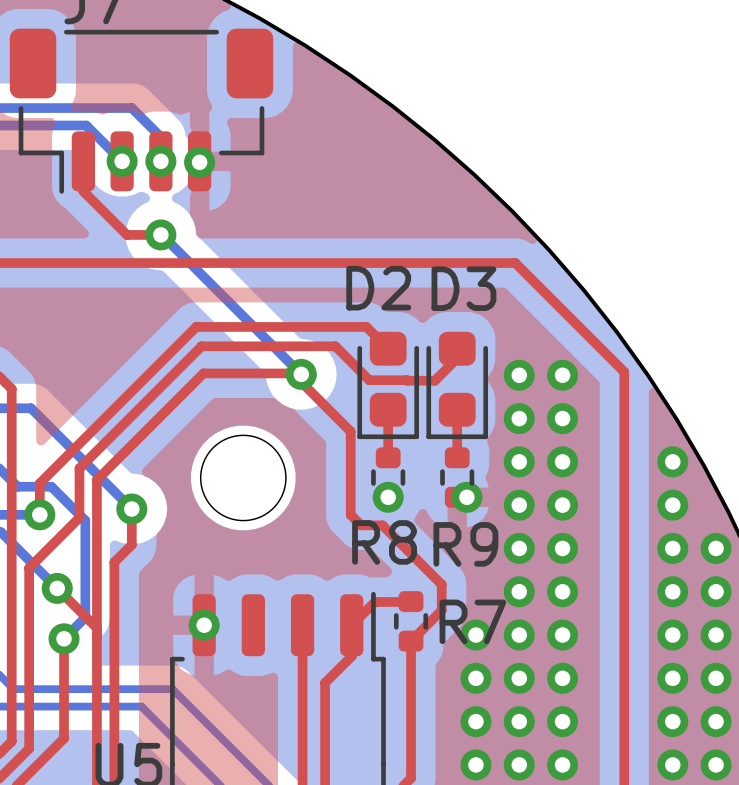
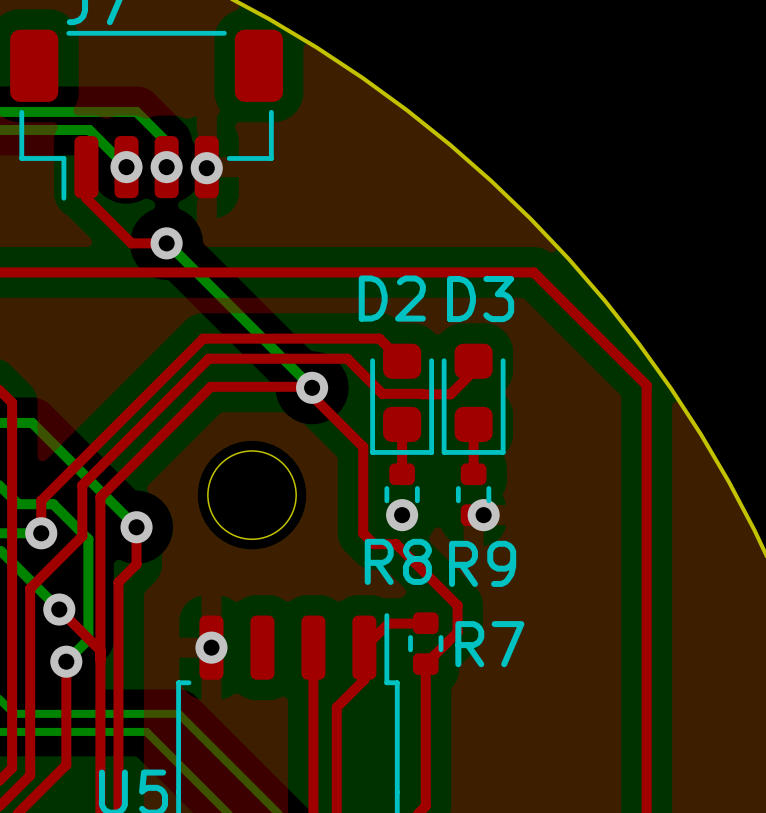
via: (519, 375) -> none
via: (562, 375) -> none
via: (519, 418) -> none
via: (562, 418) -> none
via: (519, 461) -> none
via: (562, 461) -> none
via: (672, 461) -> none
via: (519, 505) -> none
via: (562, 505) -> none
via: (672, 505) -> none
via: (519, 548) -> none
via: (562, 548) -> none
via: (672, 548) -> none
via: (716, 548) -> none
via: (519, 591) -> none
via: (562, 591) -> none
via: (672, 591) -> none
via: (716, 591) -> none
via: (475, 635) -> none
via: (519, 635) -> none
via: (562, 635) -> none
via: (672, 635) -> none
via: (716, 635) -> none
via: (475, 678) -> none
via: (519, 678) -> none
via: (562, 678) -> none
via: (672, 678) -> none
via: (716, 678) -> none
via: (475, 721) -> none
via: (519, 721) -> none
via: (562, 721) -> none
via: (672, 721) -> none
via: (716, 721) -> none
via: (475, 764) -> none
via: (519, 764) -> none
via: (562, 764) -> none
via: (672, 764) -> none
via: (716, 764) -> none

